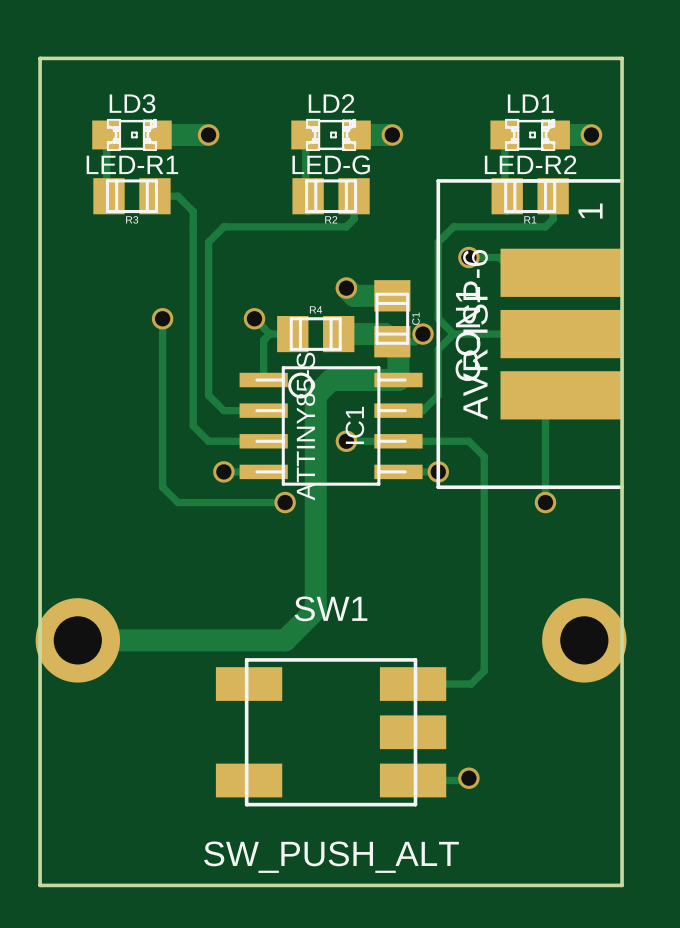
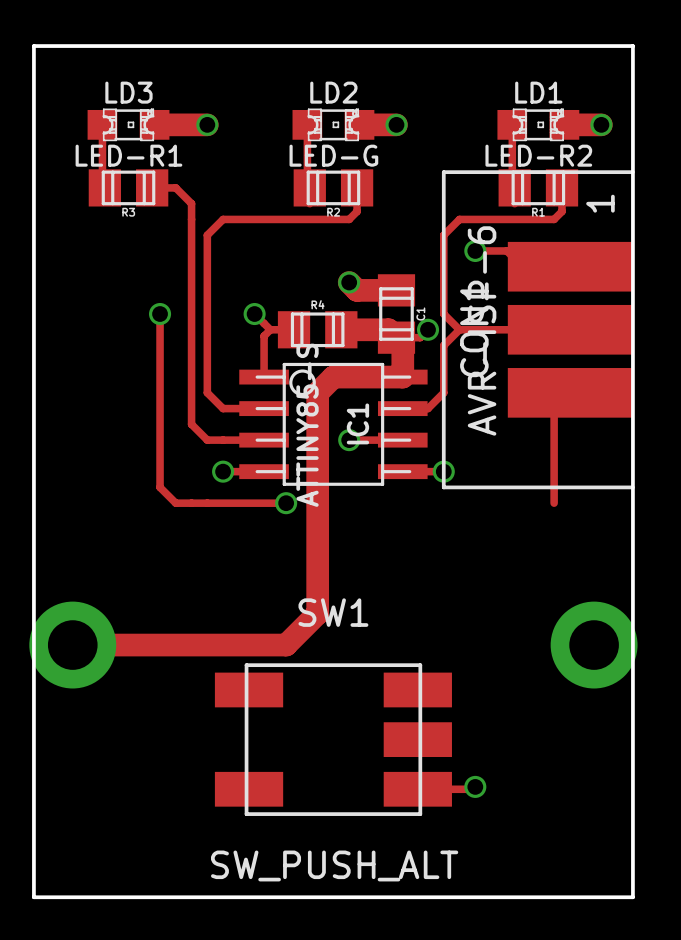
track: (398, 441) (468, 441) (484, 456) (484, 671) (471, 684) (413, 684) -> none
via: (545, 502) -> none

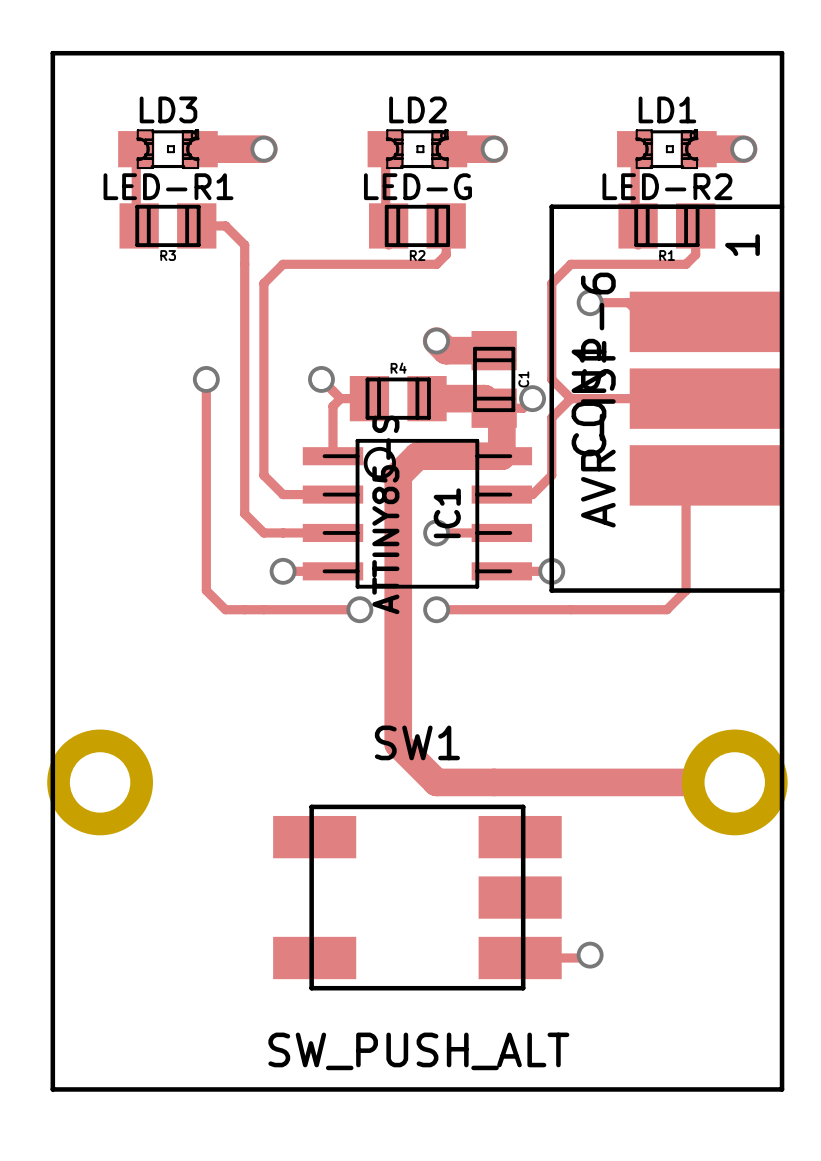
track: (554, 487) (554, 503) -> (686, 590) (666, 609) (436, 609)
via: none -> (436, 609)
track: (317, 613) (286, 645) (72, 645) -> (398, 744) (436, 782) (734, 782)

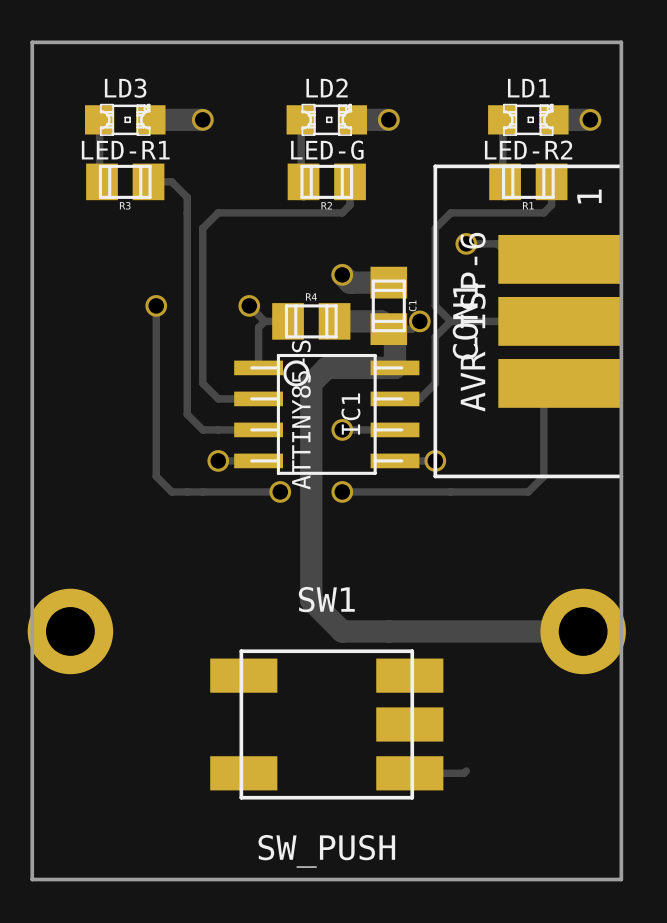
via: (590, 955) -> none
SW1 value: SW_PUSH_ALT (418, 1051) -> SW_PUSH (326, 851)

